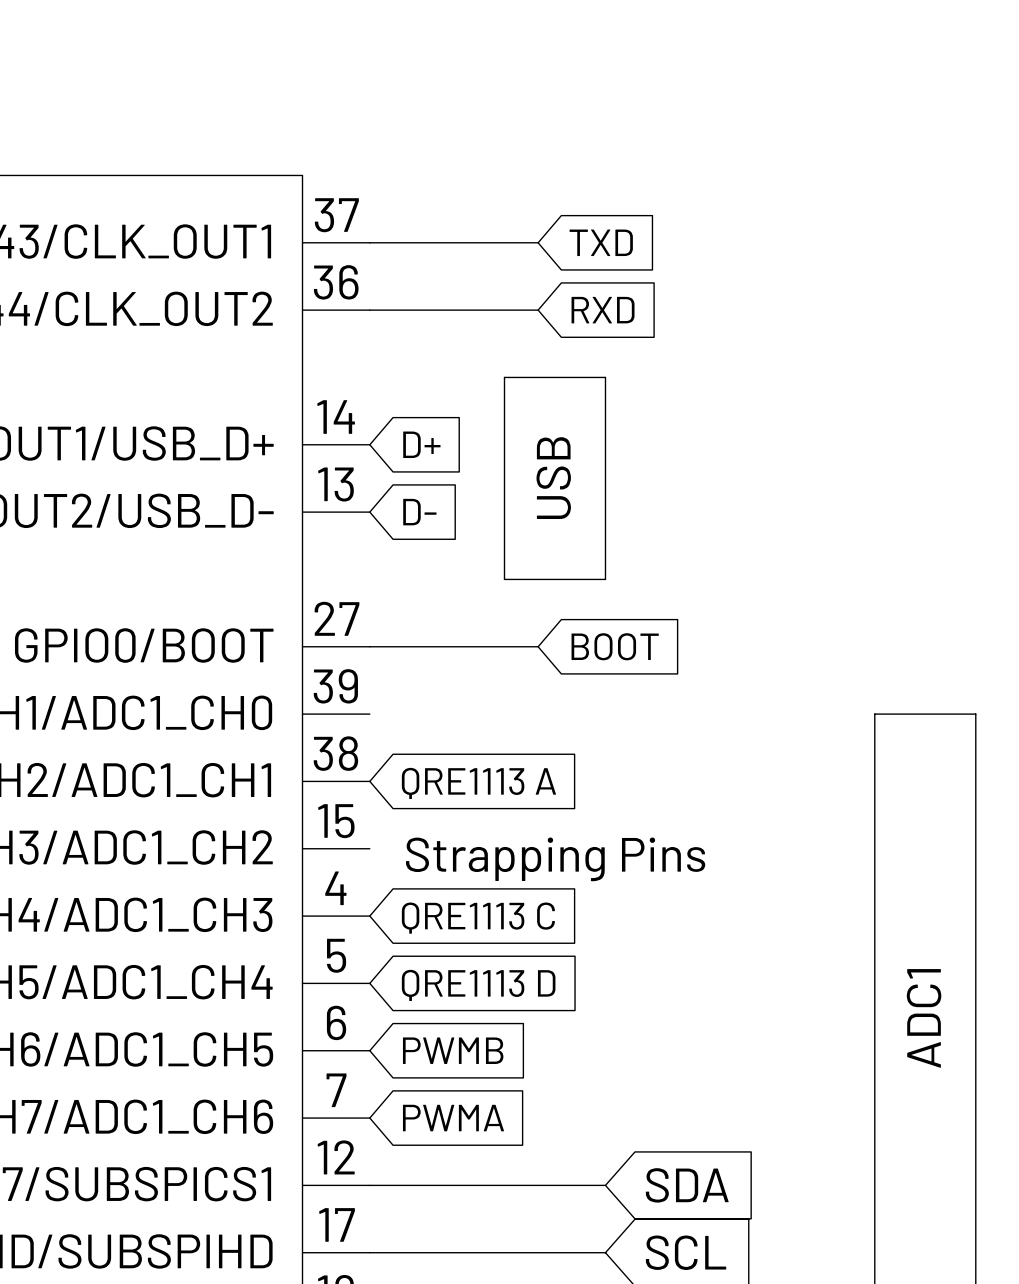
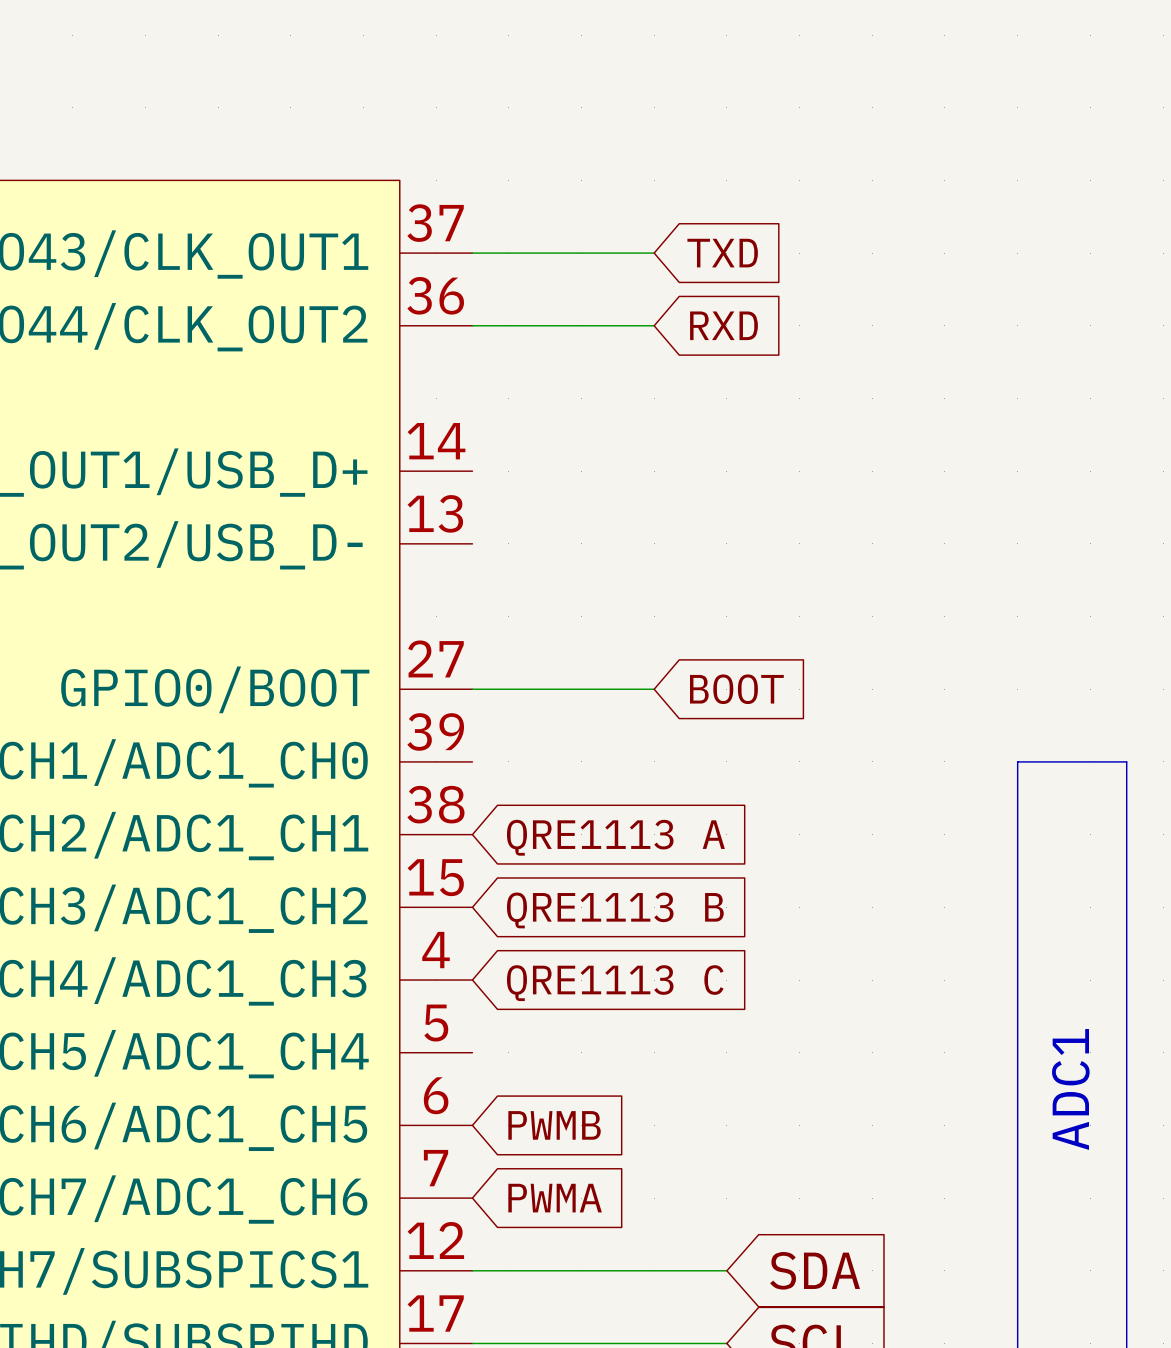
line: (504, 377) (605, 377) (605, 579) (504, 579) (504, 377) -> none
global label: D+ (421, 444) -> none
text: USB (553, 478) -> none
global label: D- (419, 512) -> none
global label: none -> QRE1113 B (615, 910)
text: Strapping Pins (555, 859) -> none
global label: QRE1113 D (478, 985) -> none

